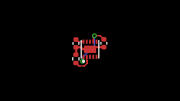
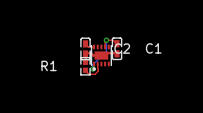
part: (75, 43) -> none
C2: none -> (85, 48)
part: (103, 43) -> none
C1: none -> (117, 48)
part: (75, 58) -> none
R1: none -> (85, 66)

